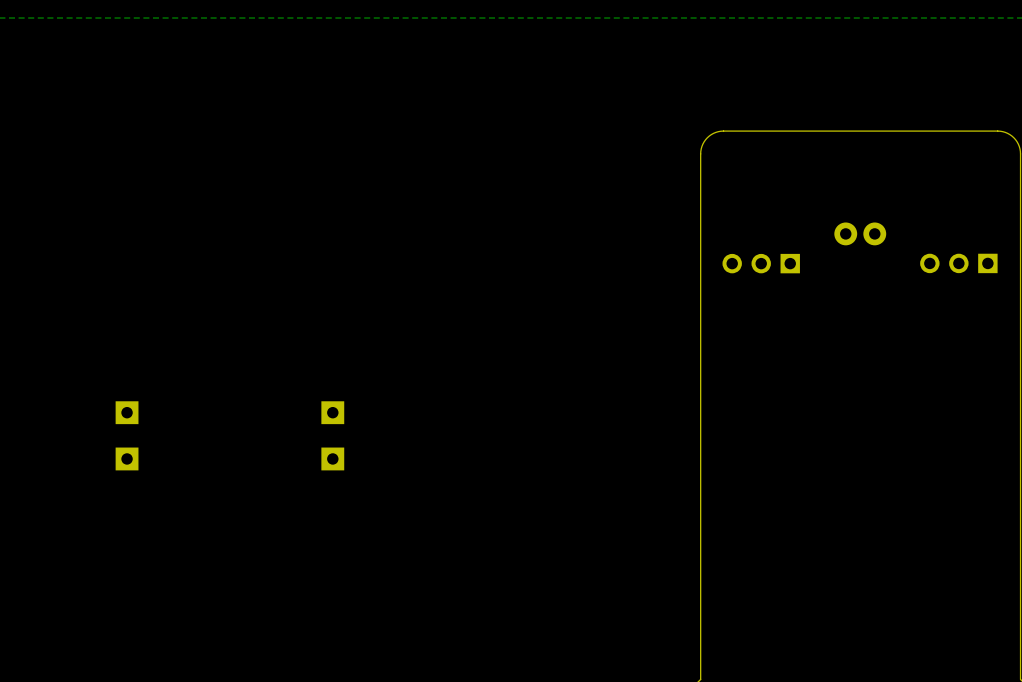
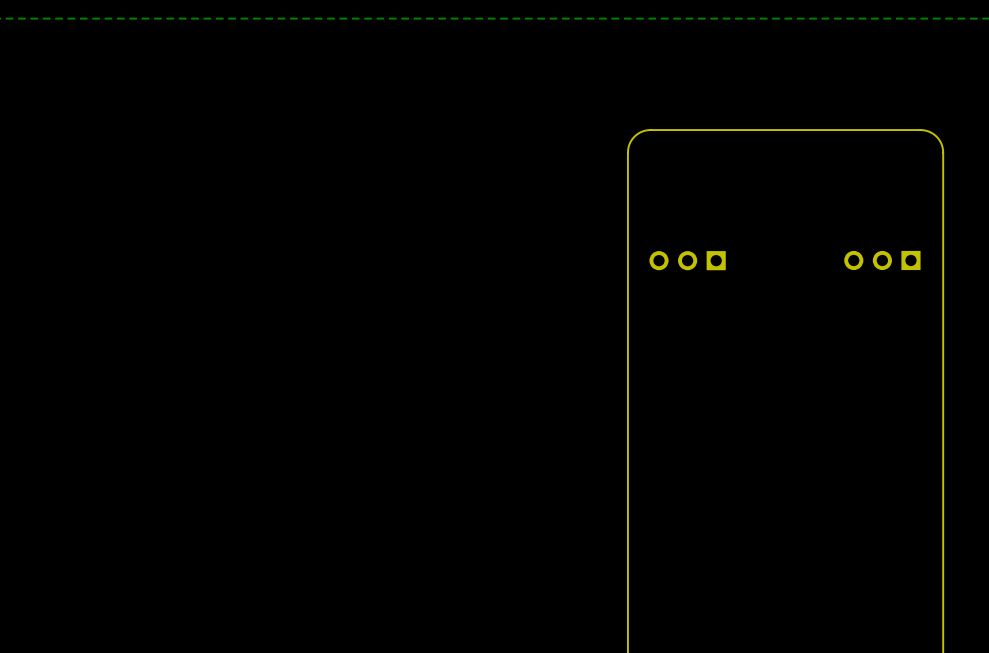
part: (860, 233) -> none
part: (127, 412) -> none
part: (332, 412) -> none
part: (127, 458) -> none
part: (332, 458) -> none

